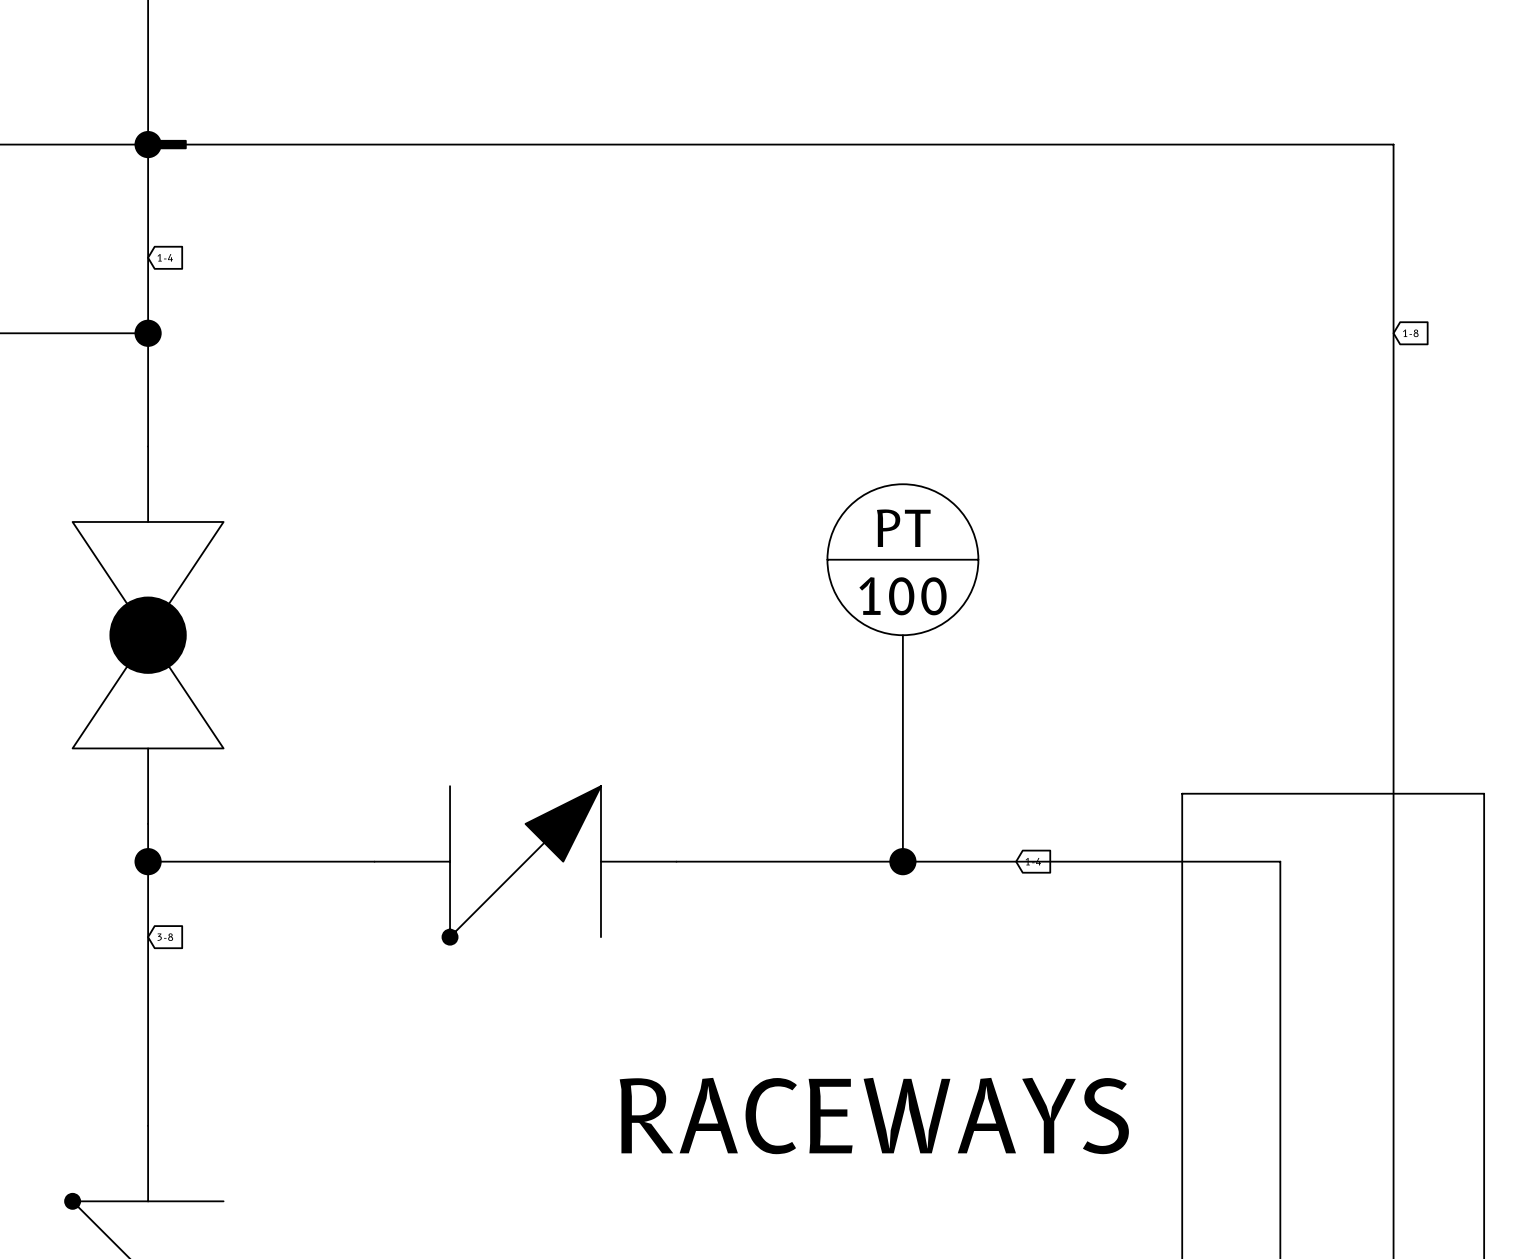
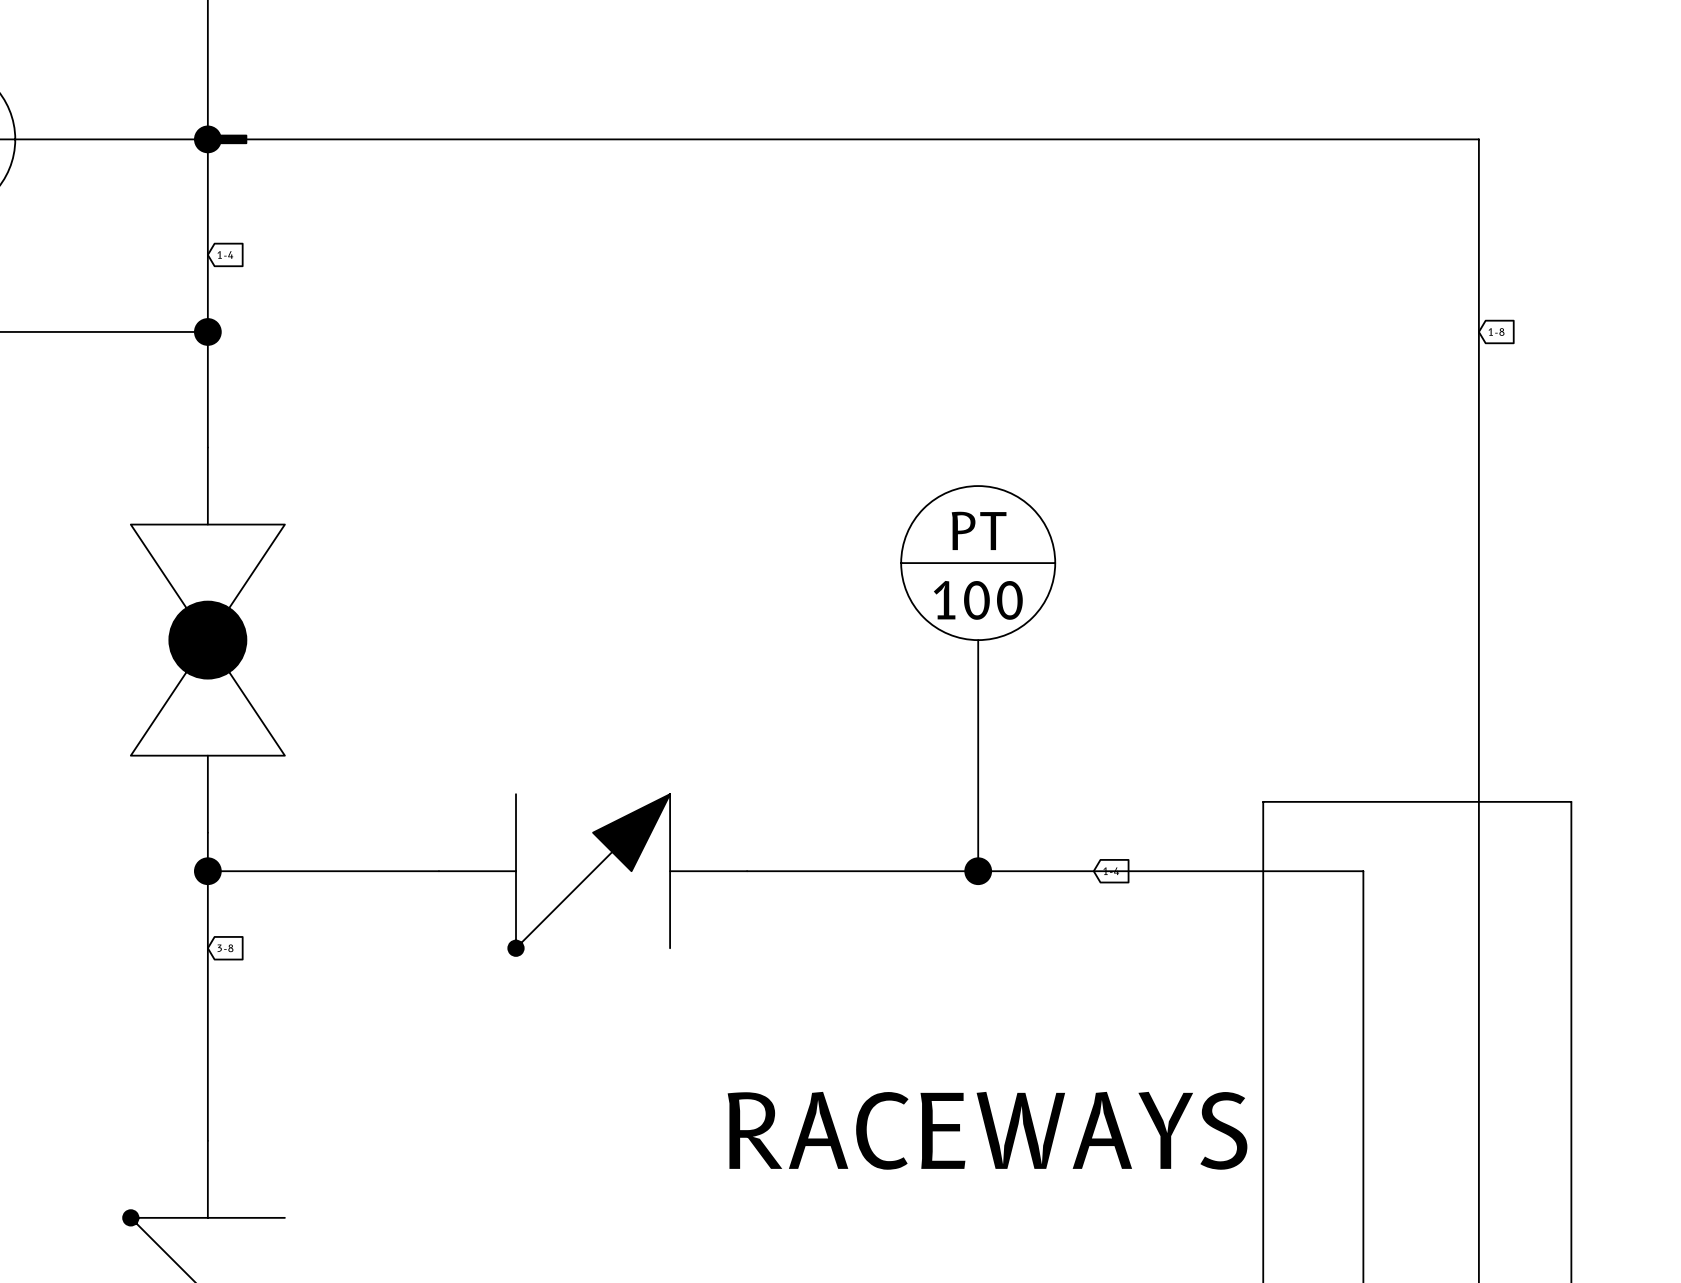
text position: RACEWAYS (874, 1116) -> RACEWAYS (987, 1130)

